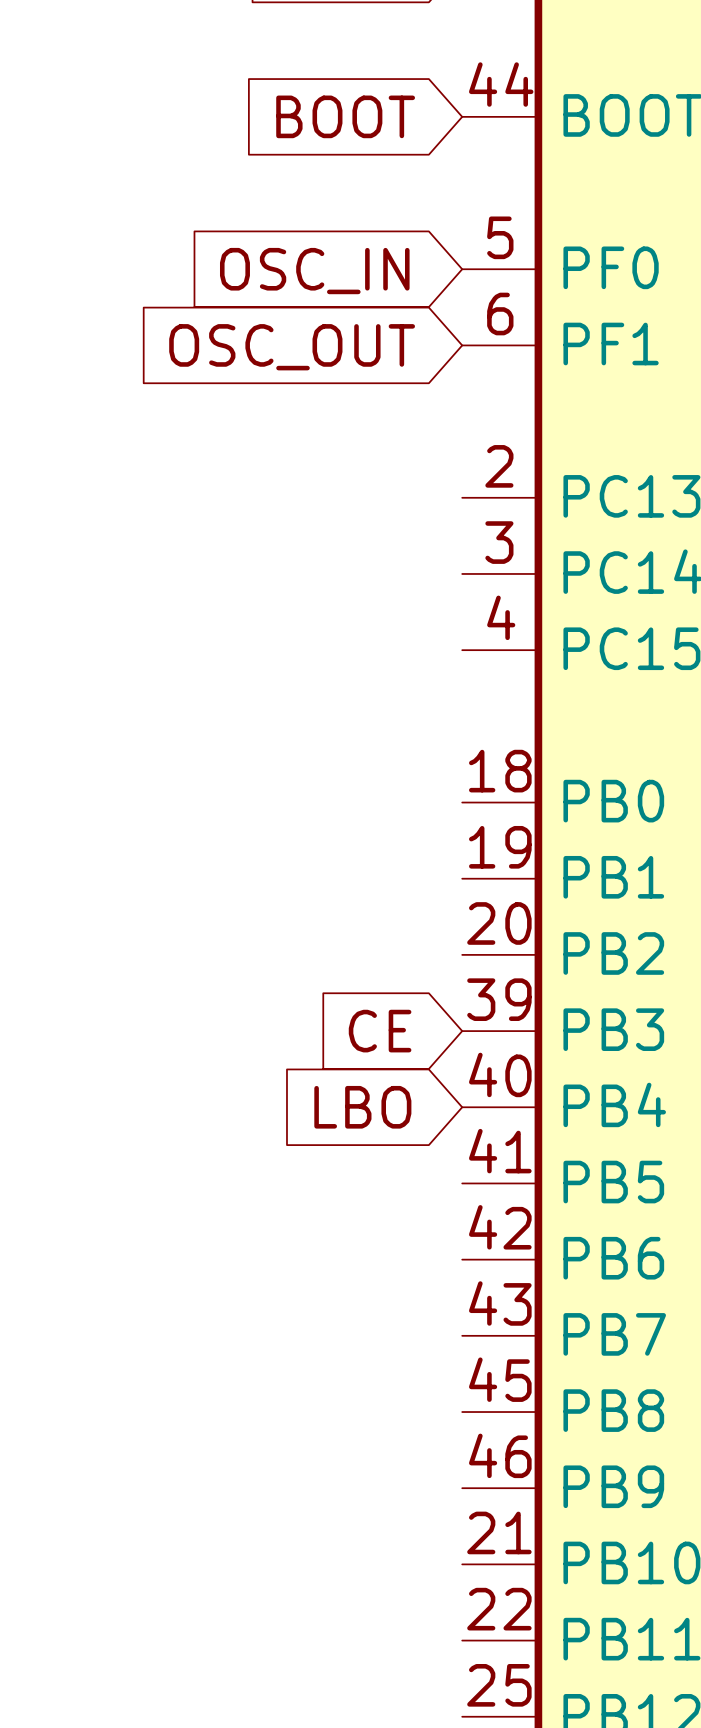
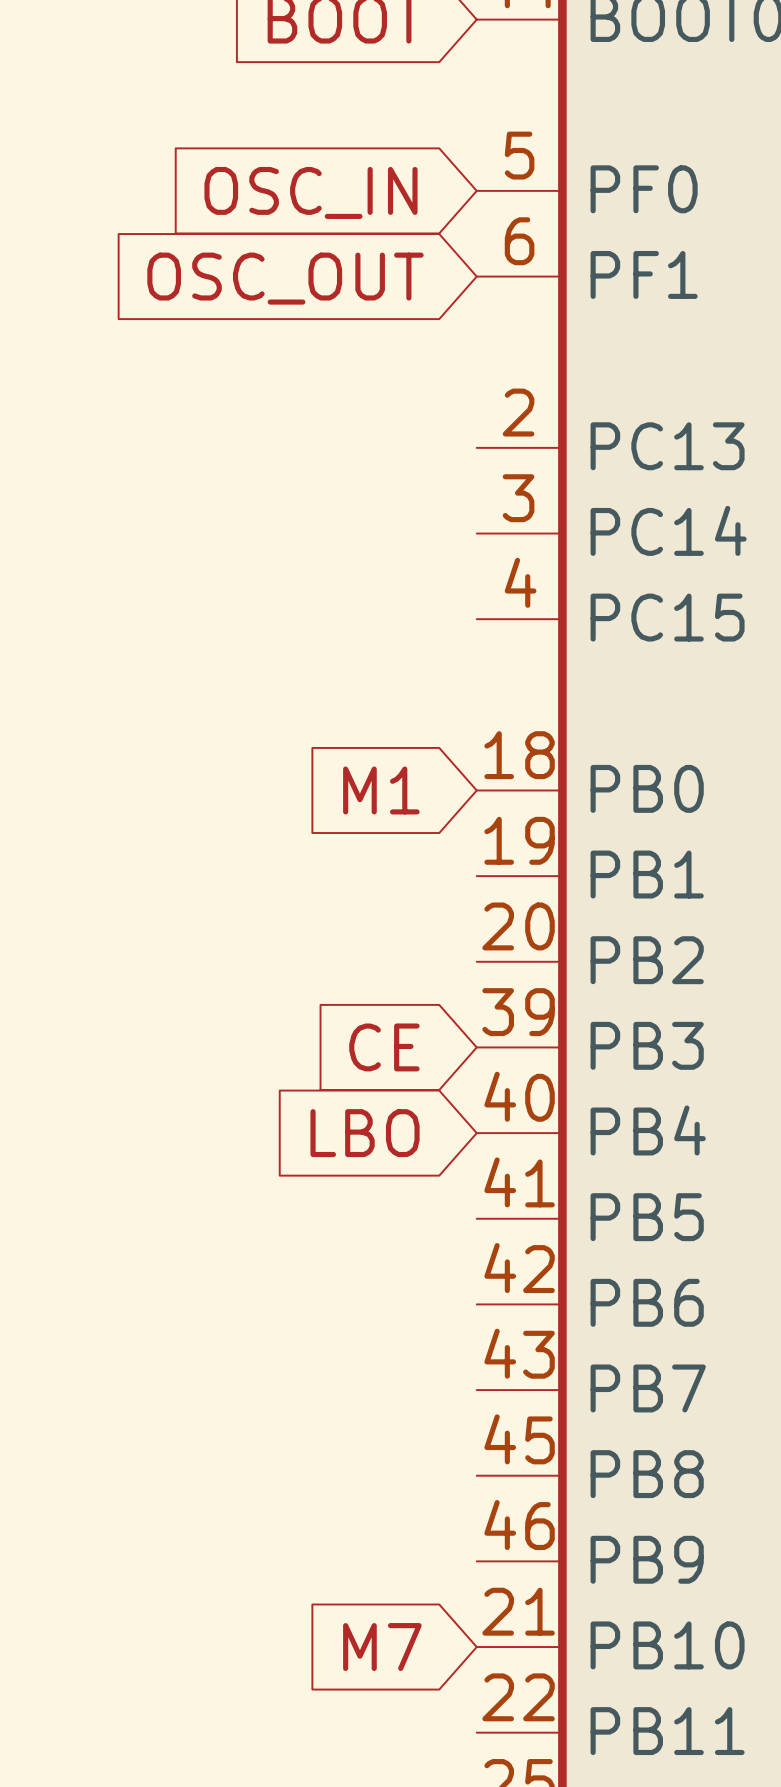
global label: none -> M1 (381, 790)
global label: none -> M7 (382, 1647)

